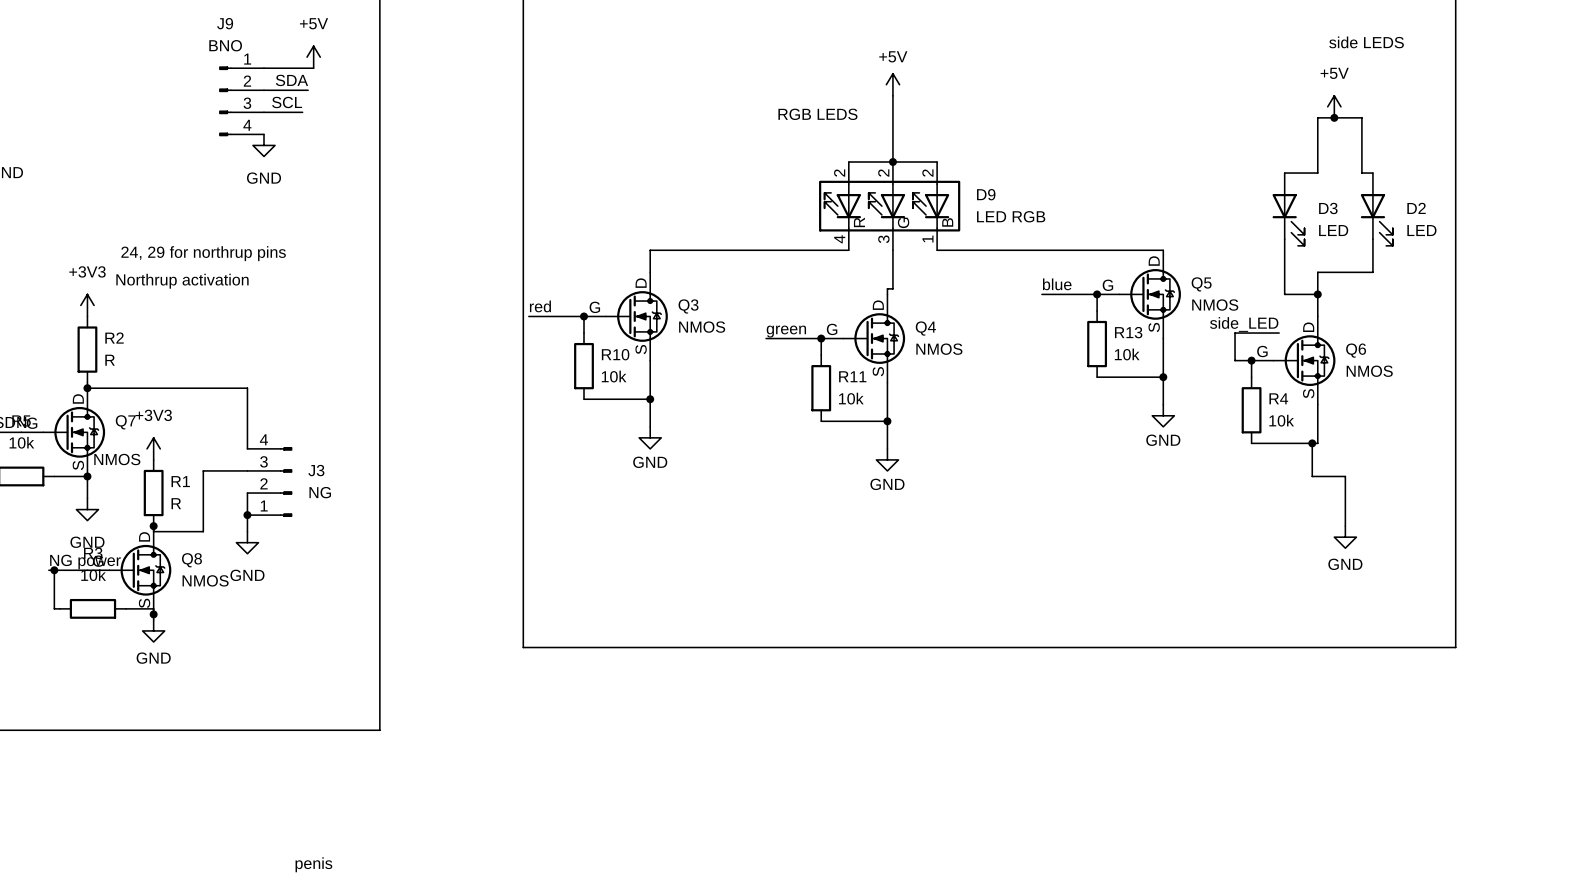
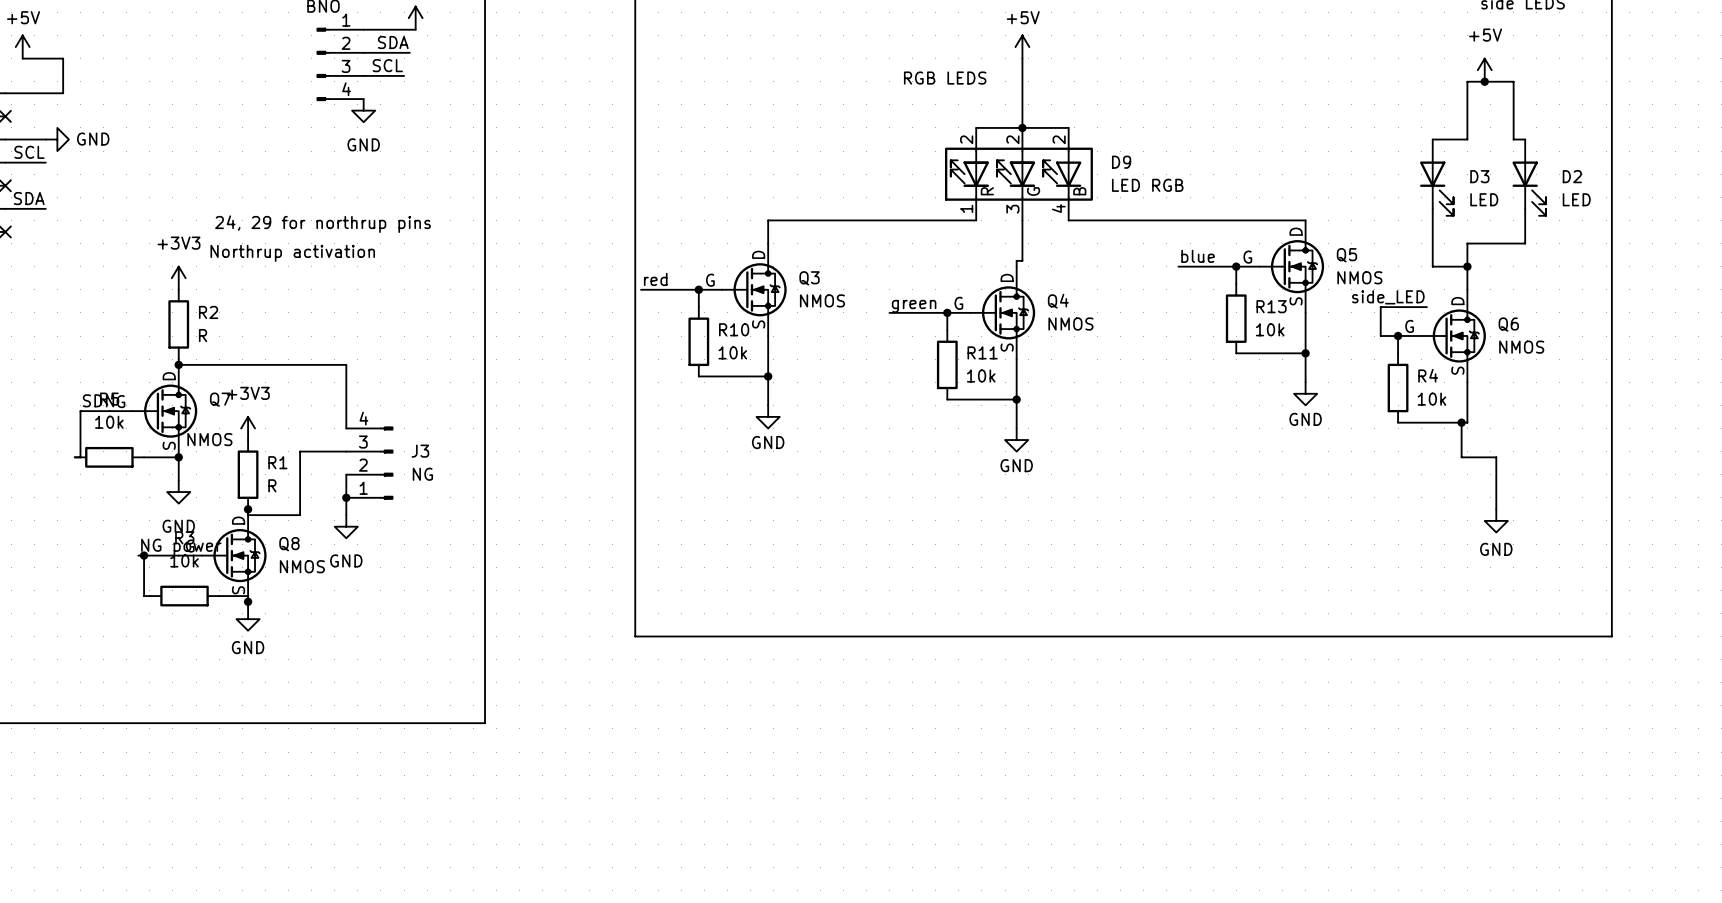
D9 pin number: 4 (839, 239) -> 1 (966, 208)
D9 pin number: 1 (927, 239) -> 4 (1058, 208)
text: penis (313, 864) -> none

